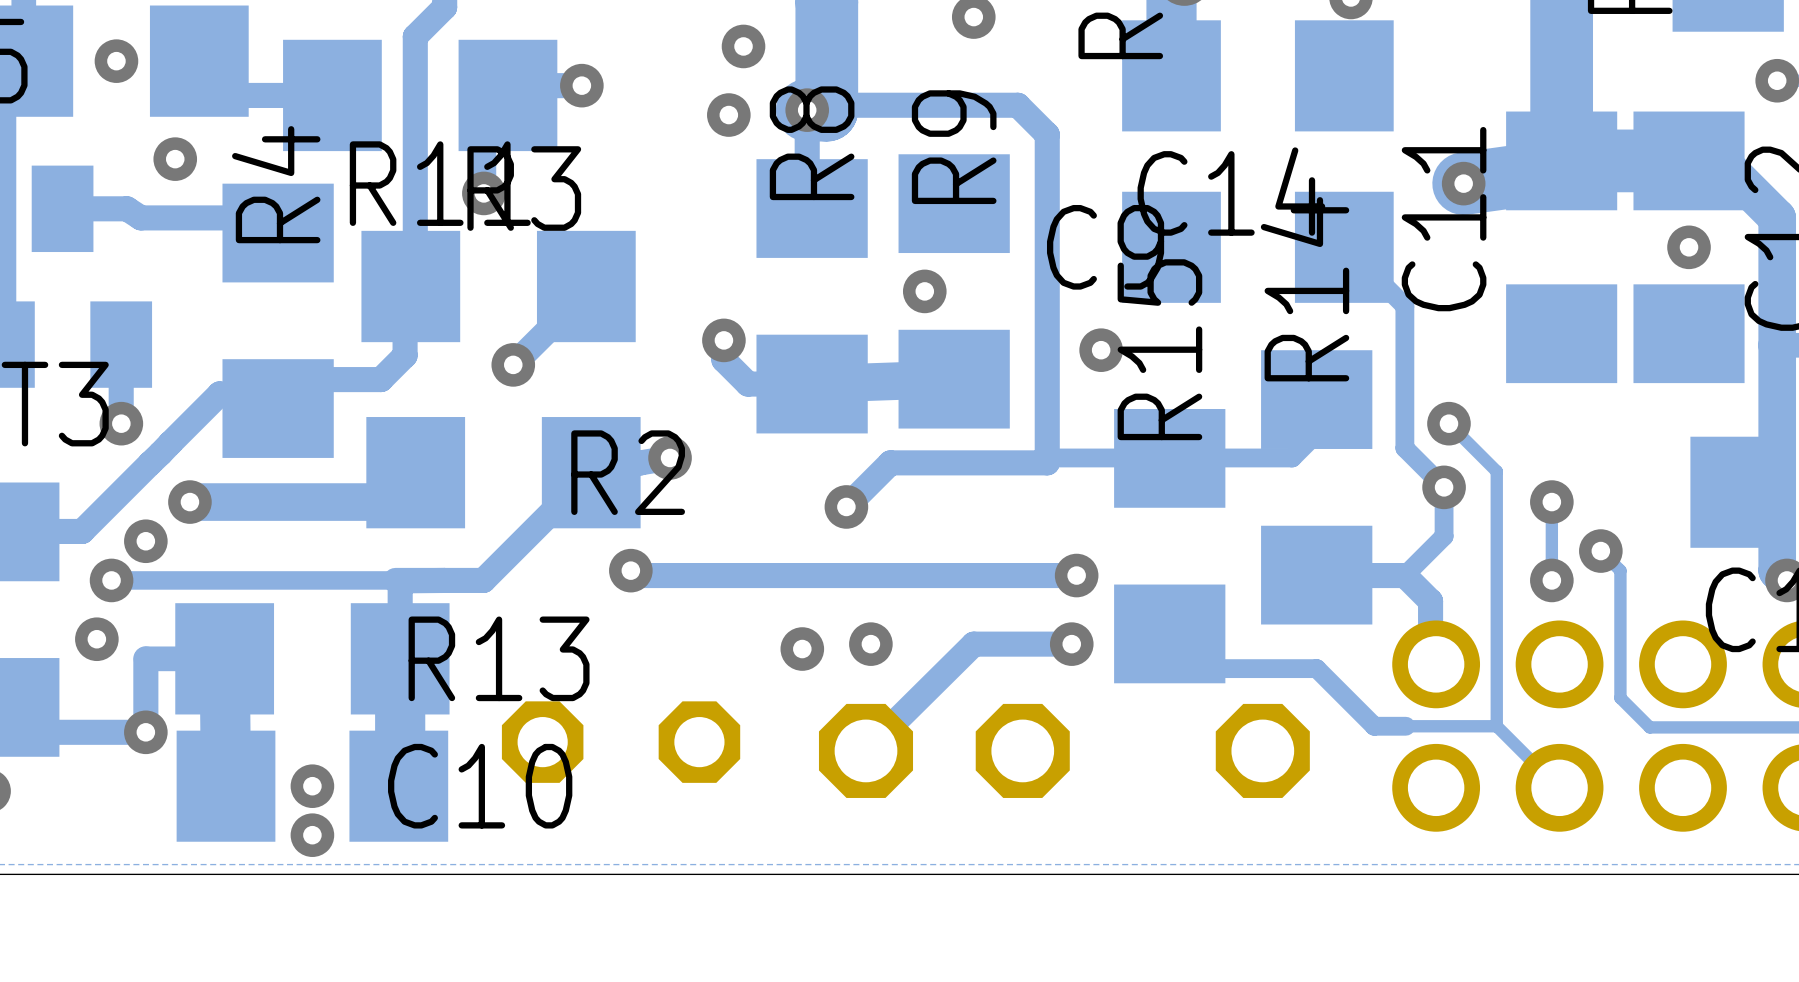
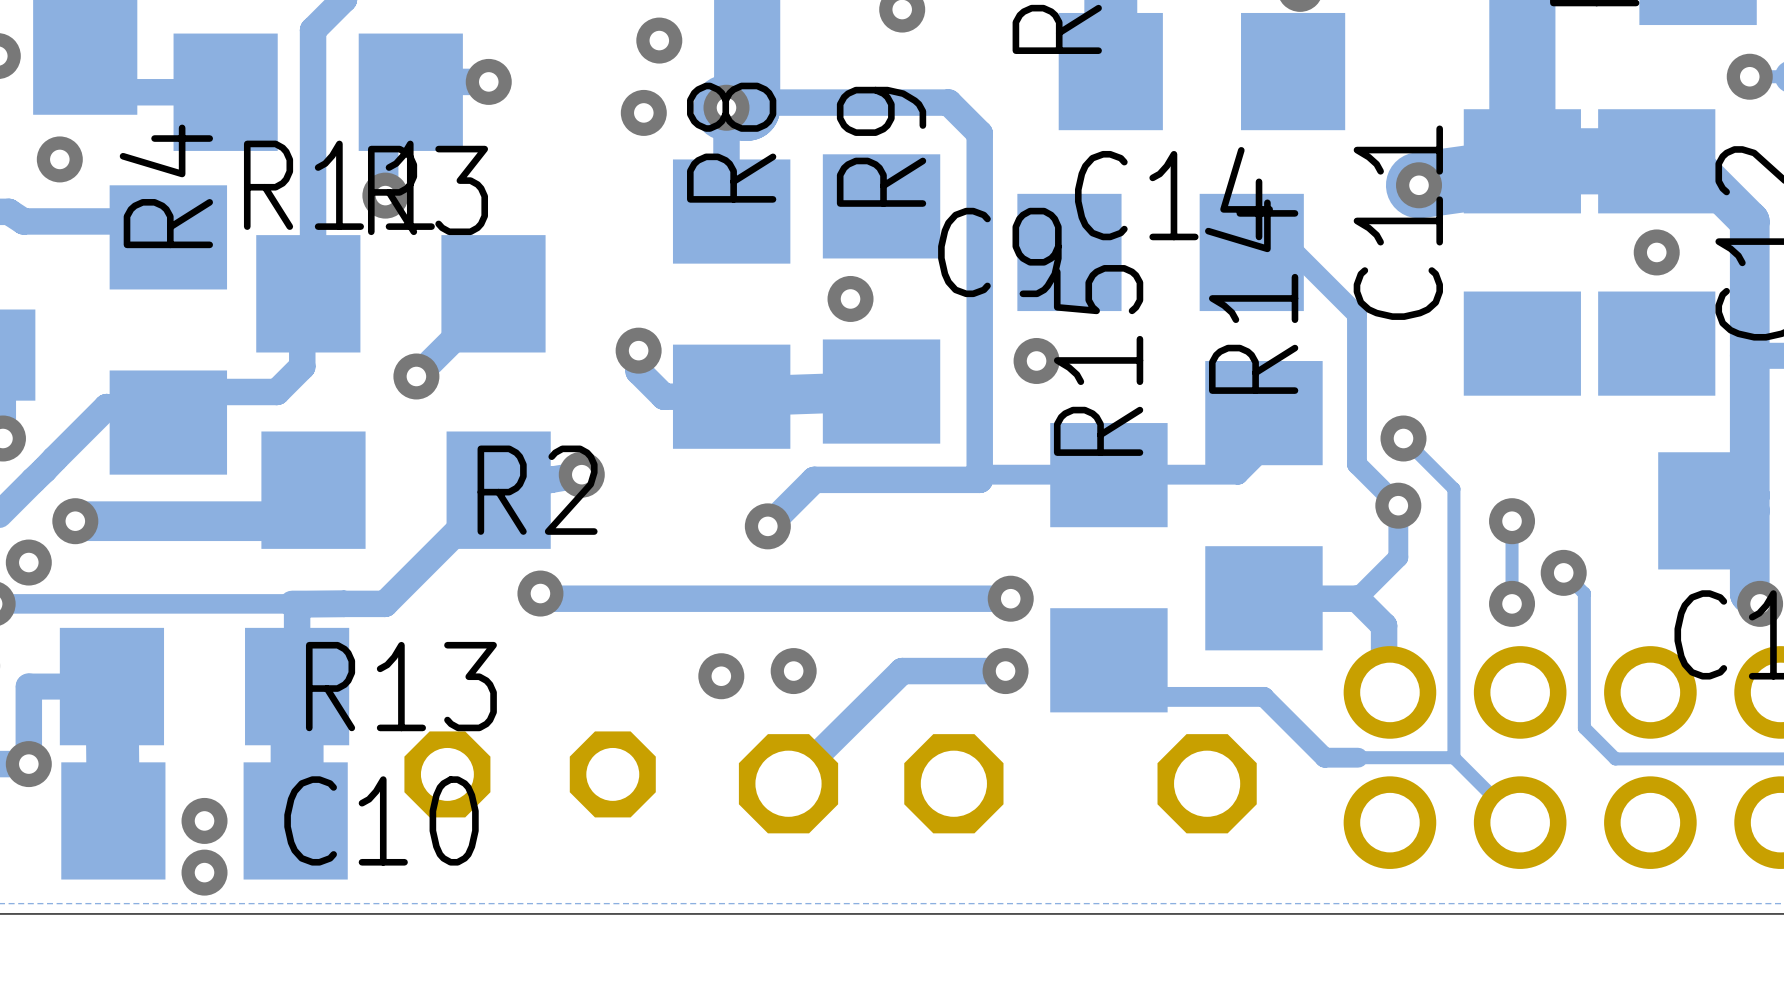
C9 position: (1257, 247) -> (1160, 252)

